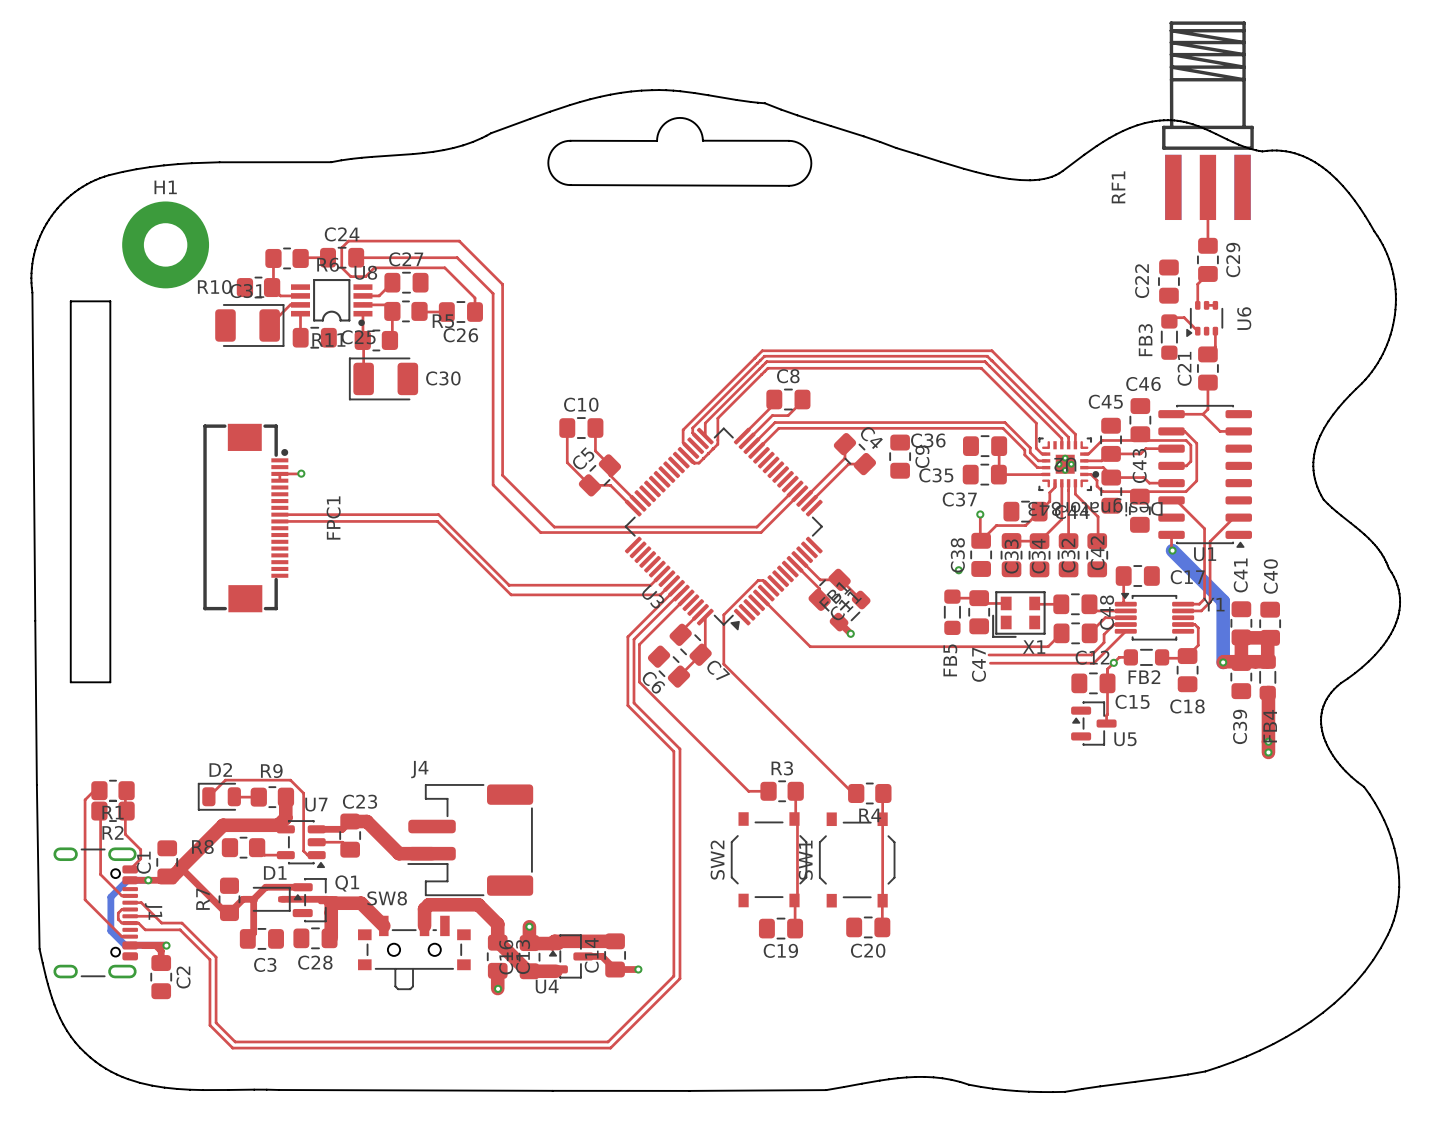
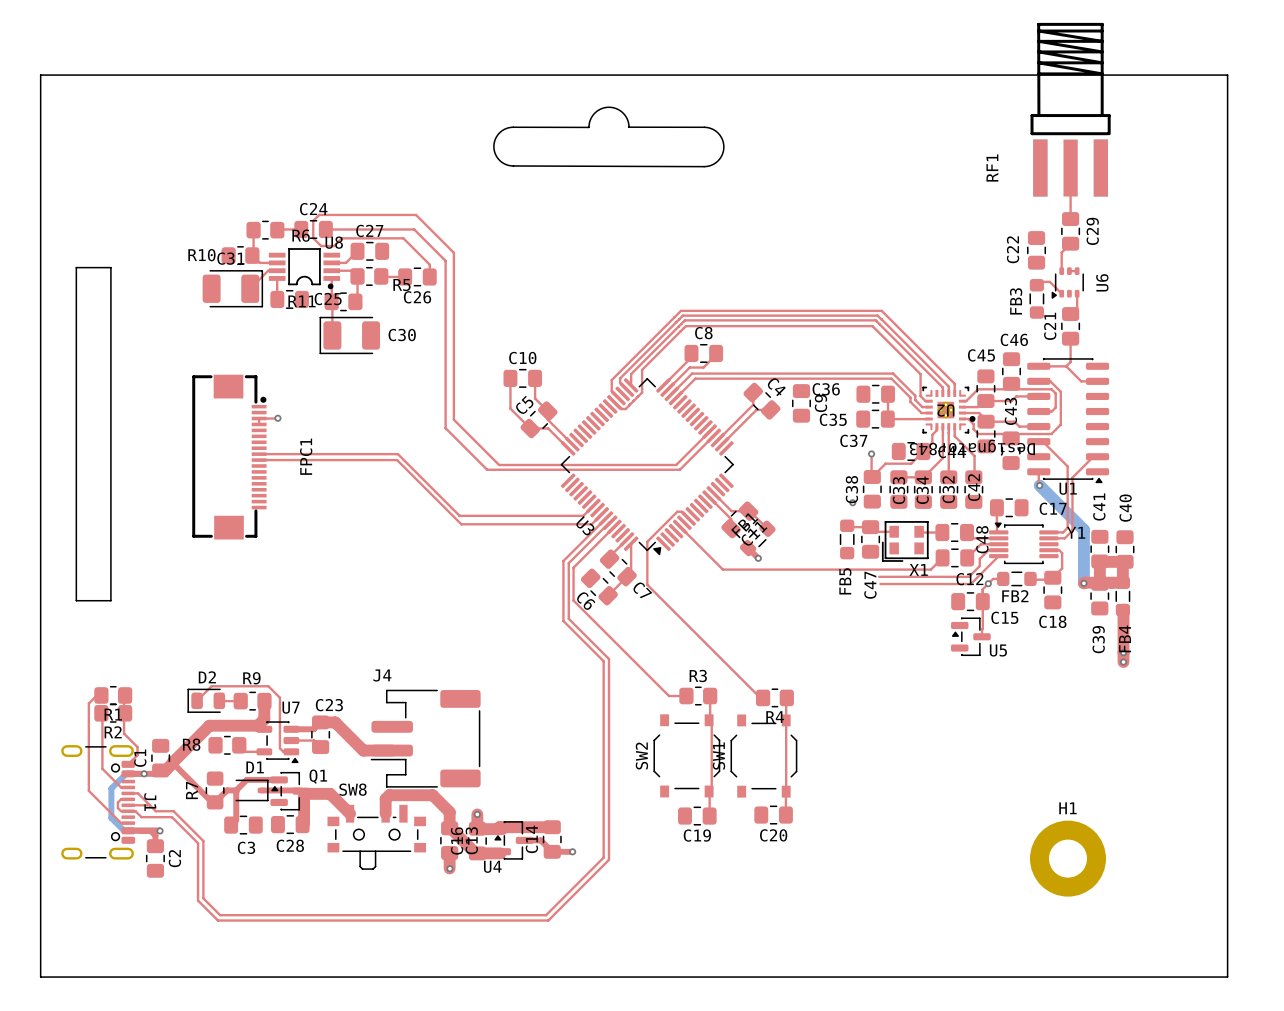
board edge: (659, 90) (764, 103) (940, 161) (987, 174) (1020, 180) (1039, 179) (1055, 175) (1102, 142) (1130, 127) (1156, 120) (1180, 121) (1198, 126) (1250, 148) (1262, 151) (1286, 151) (1307, 158) (1322, 167) (1336, 179) (1360, 208) (1382, 244) (1390, 264) (1395, 289) (1394, 319) (1387, 344) (1377, 362) (1365, 379) (1338, 407) (1324, 428) (1315, 450) (1313, 470) (1317, 486) (1323, 499) (1368, 538) (1382, 554) (1397, 585) (1399, 606) (1394, 626) (1380, 648) (1368, 661) (1337, 686) (1328, 695) (1322, 709) (1321, 723) (1324, 738) (1332, 755) (1345, 771) (1364, 786) (1384, 820) (1396, 857) (1398, 896) (1392, 925) (1373, 960) (1345, 993) (1311, 1021) (1260, 1050) (1205, 1071) (1052, 1092) (992, 1088) (951, 1079) (924, 1076) (888, 1079) (826, 1090) (190, 1089) (152, 1085) (116, 1074) (90, 1057) (70, 1036) (54, 1004) (39, 948) (31, 278) (35, 249) (46, 223) (60, 204) (78, 189) (99, 178) (122, 171) (191, 163) (331, 162) (433, 151) (463, 145) (530, 118) (590, 99) (620, 92) (659, 90) -> (40, 75) (40, 977) (1227, 977) (1227, 75) (40, 75)
H1 position: (165, 244) -> (1067, 858)

